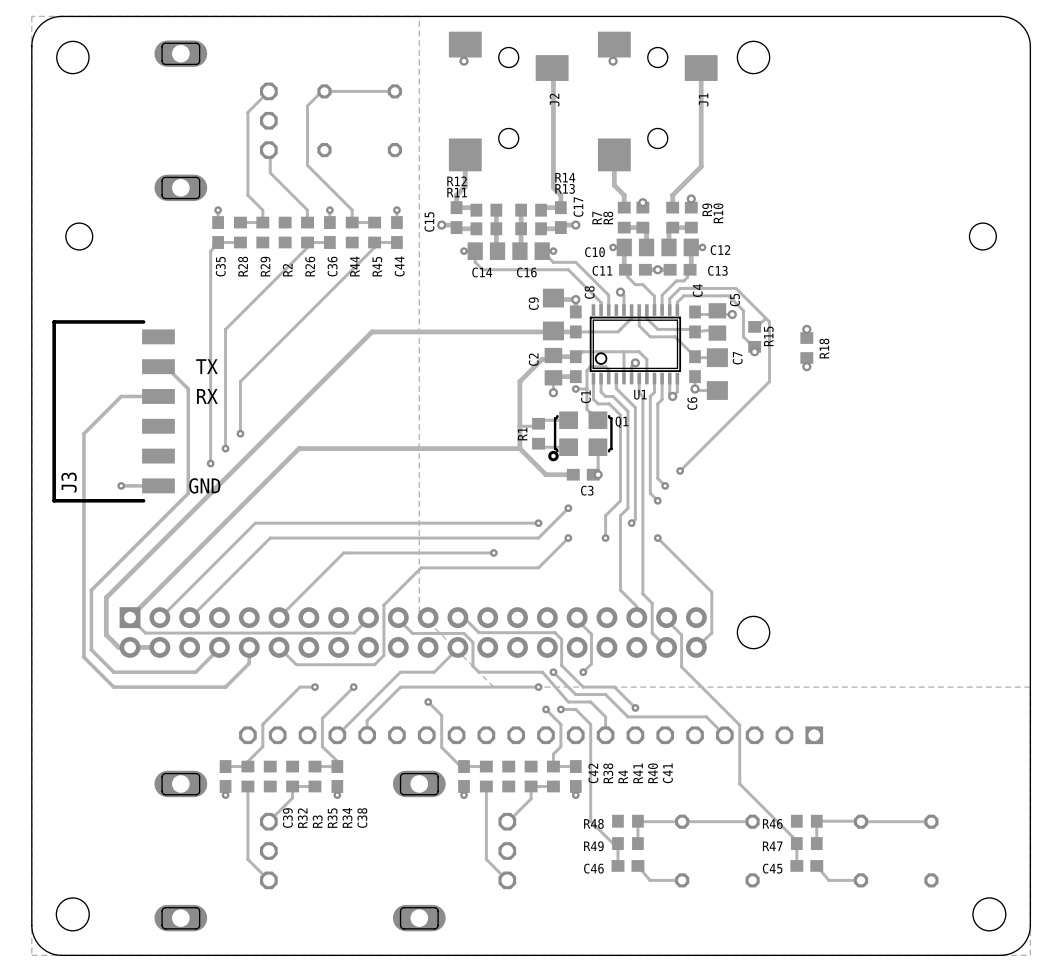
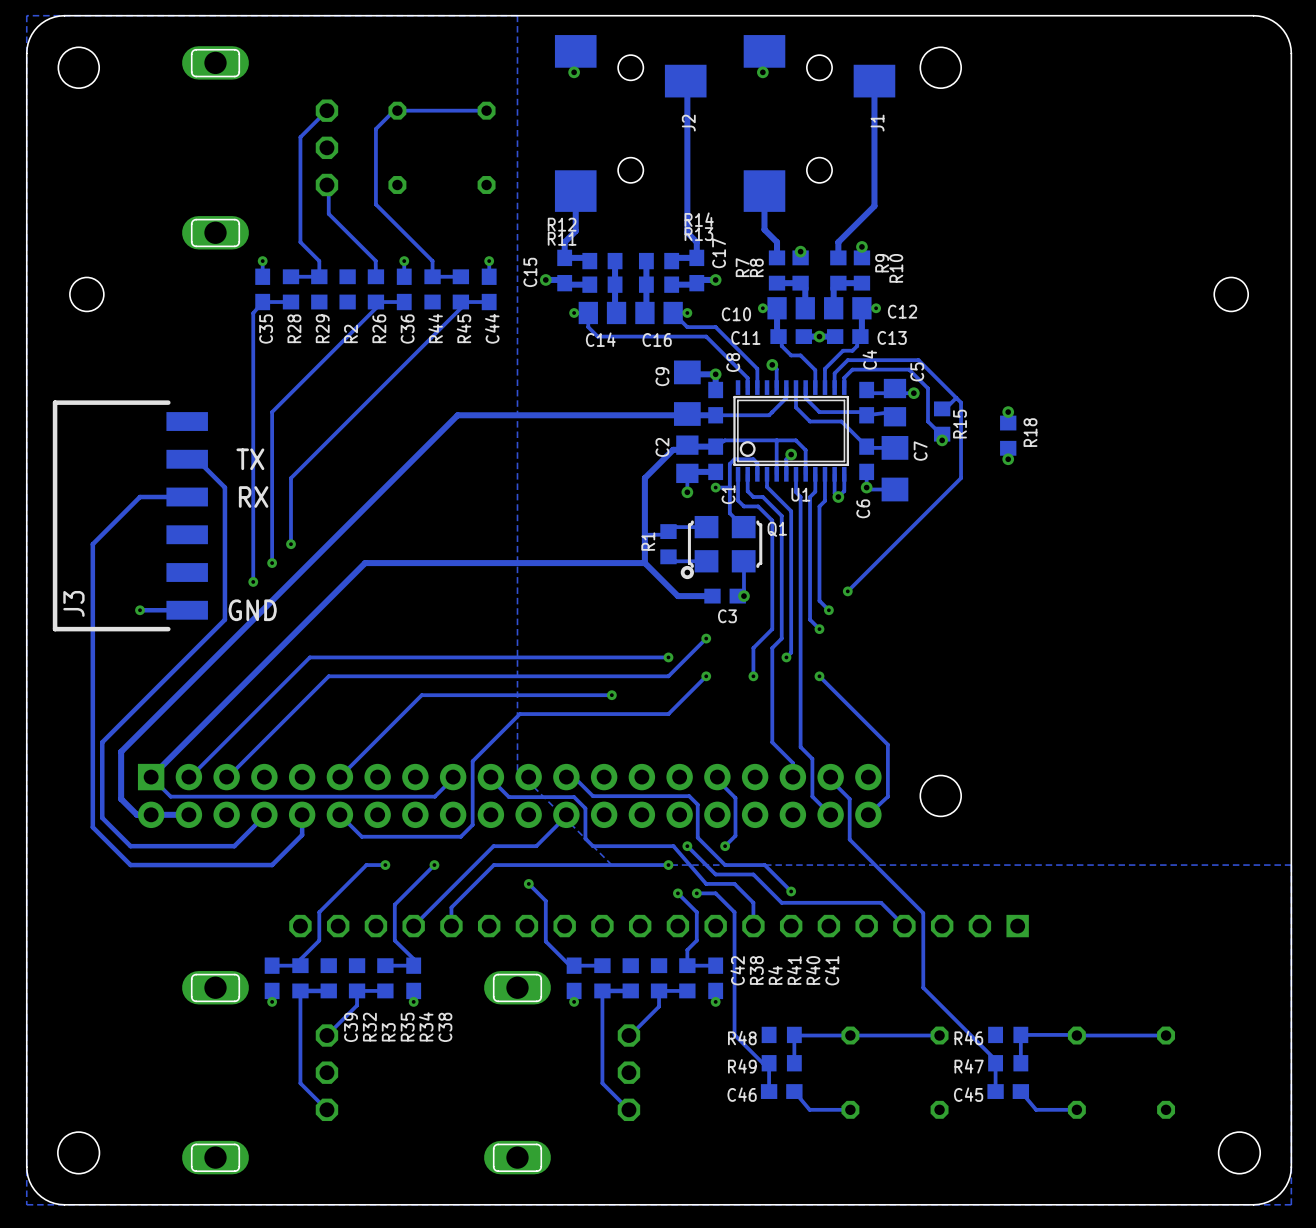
track: none -> (328, 990) (300, 990)
track: none -> (630, 990) (602, 990)

